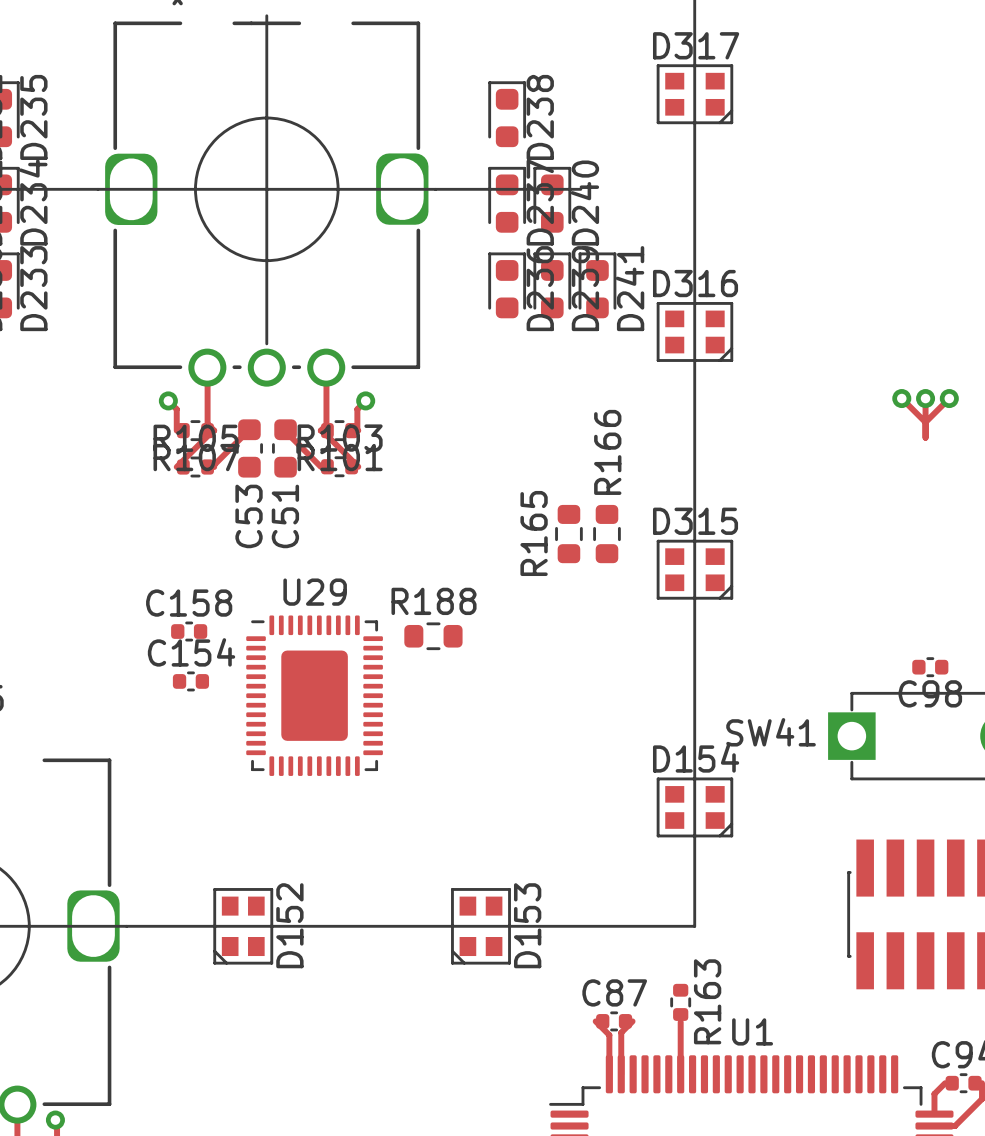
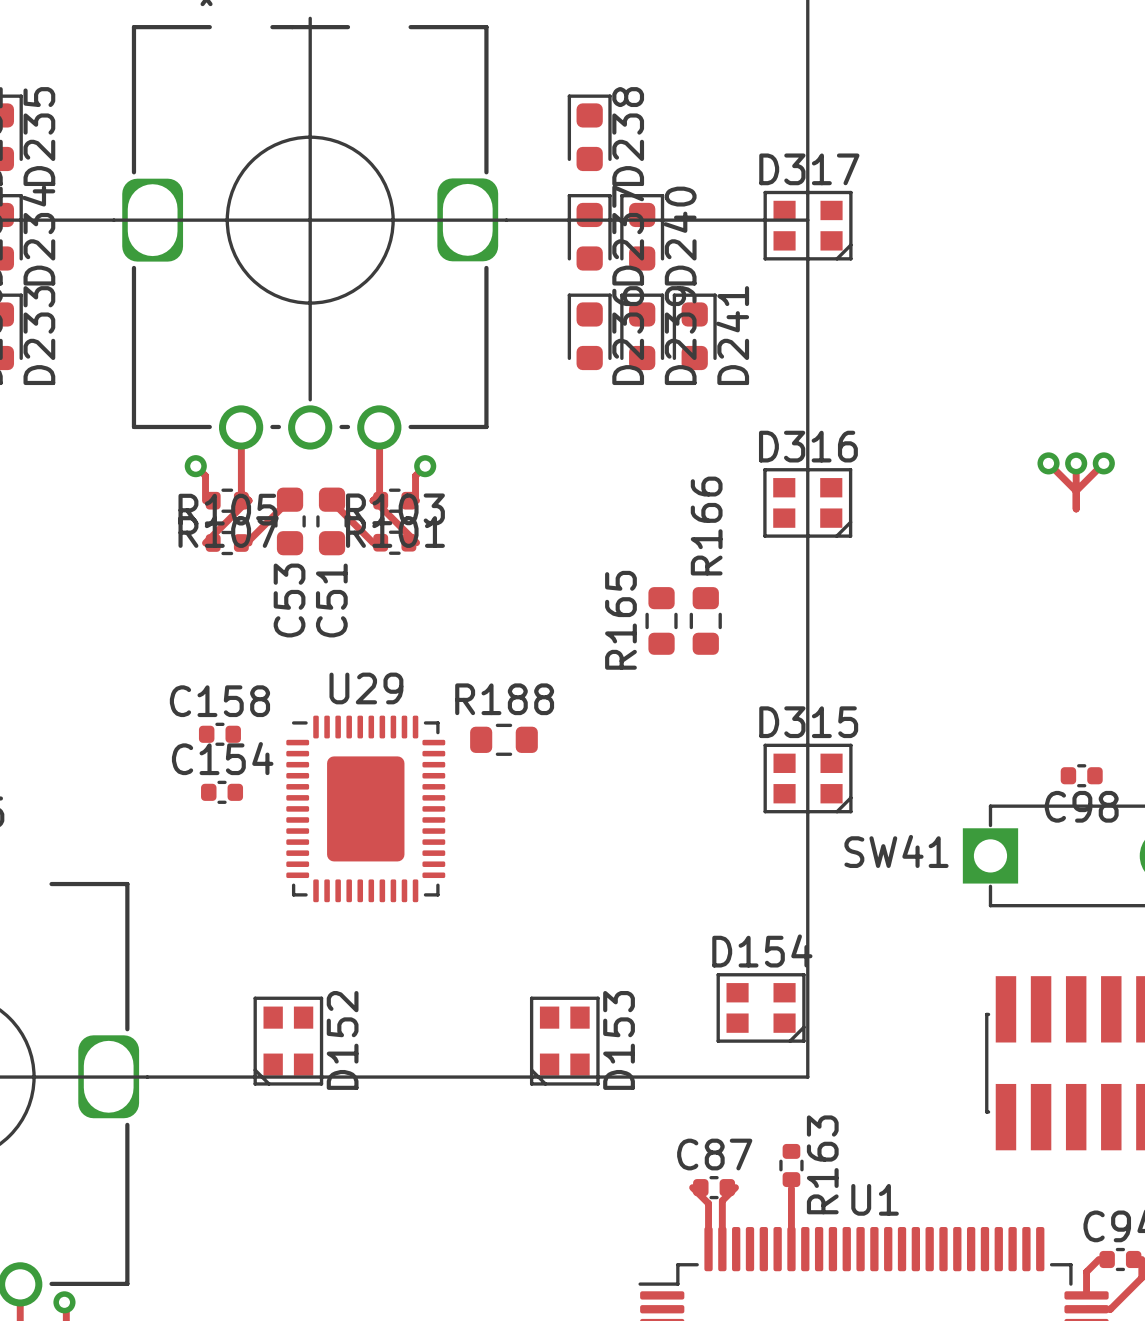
D317 position: (694, 94) -> (808, 225)
line: none -> (675, 220) (807, 220)
D316 position: (694, 331) -> (807, 502)
D315 position: (694, 569) -> (808, 778)
D154 position: (694, 807) -> (761, 1007)
D152 position: (243, 926) -> (288, 1041)
D153 position: (480, 926) -> (564, 1041)

